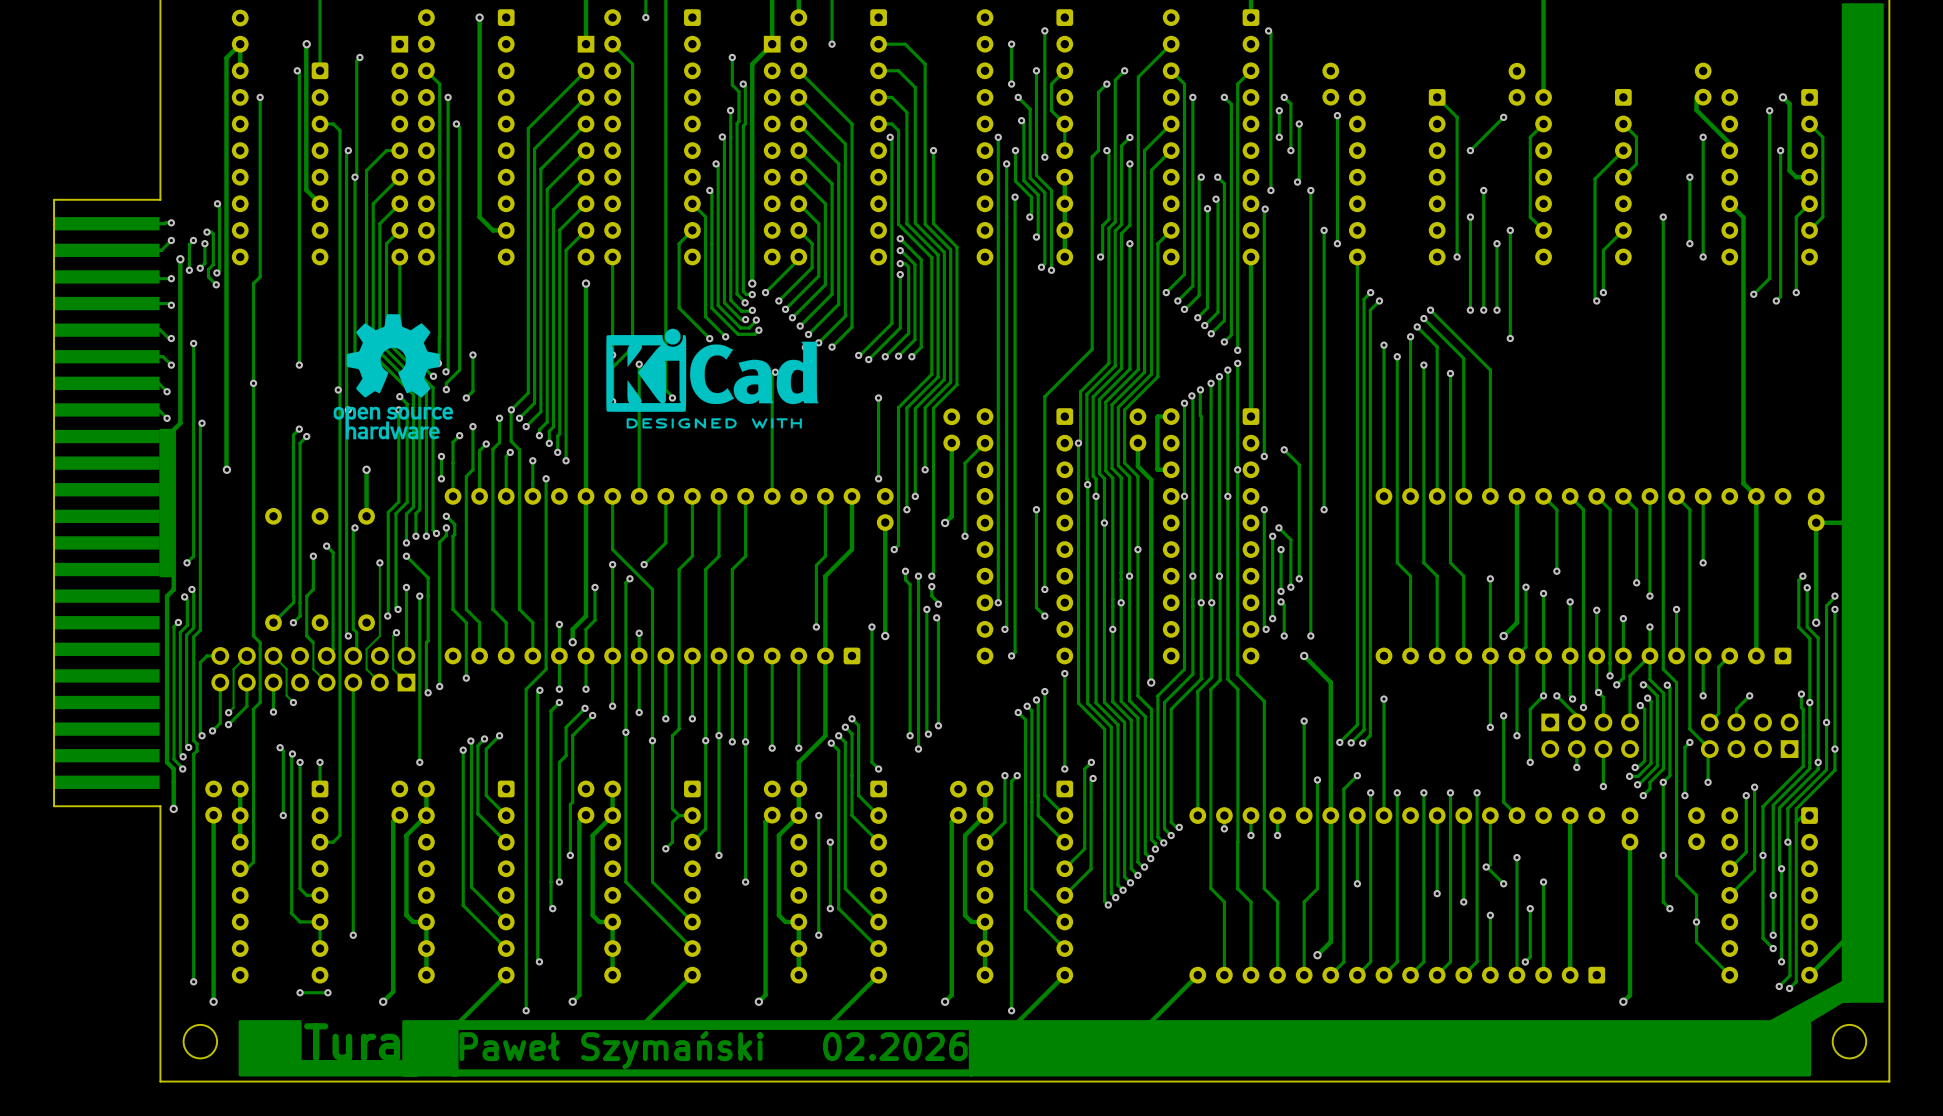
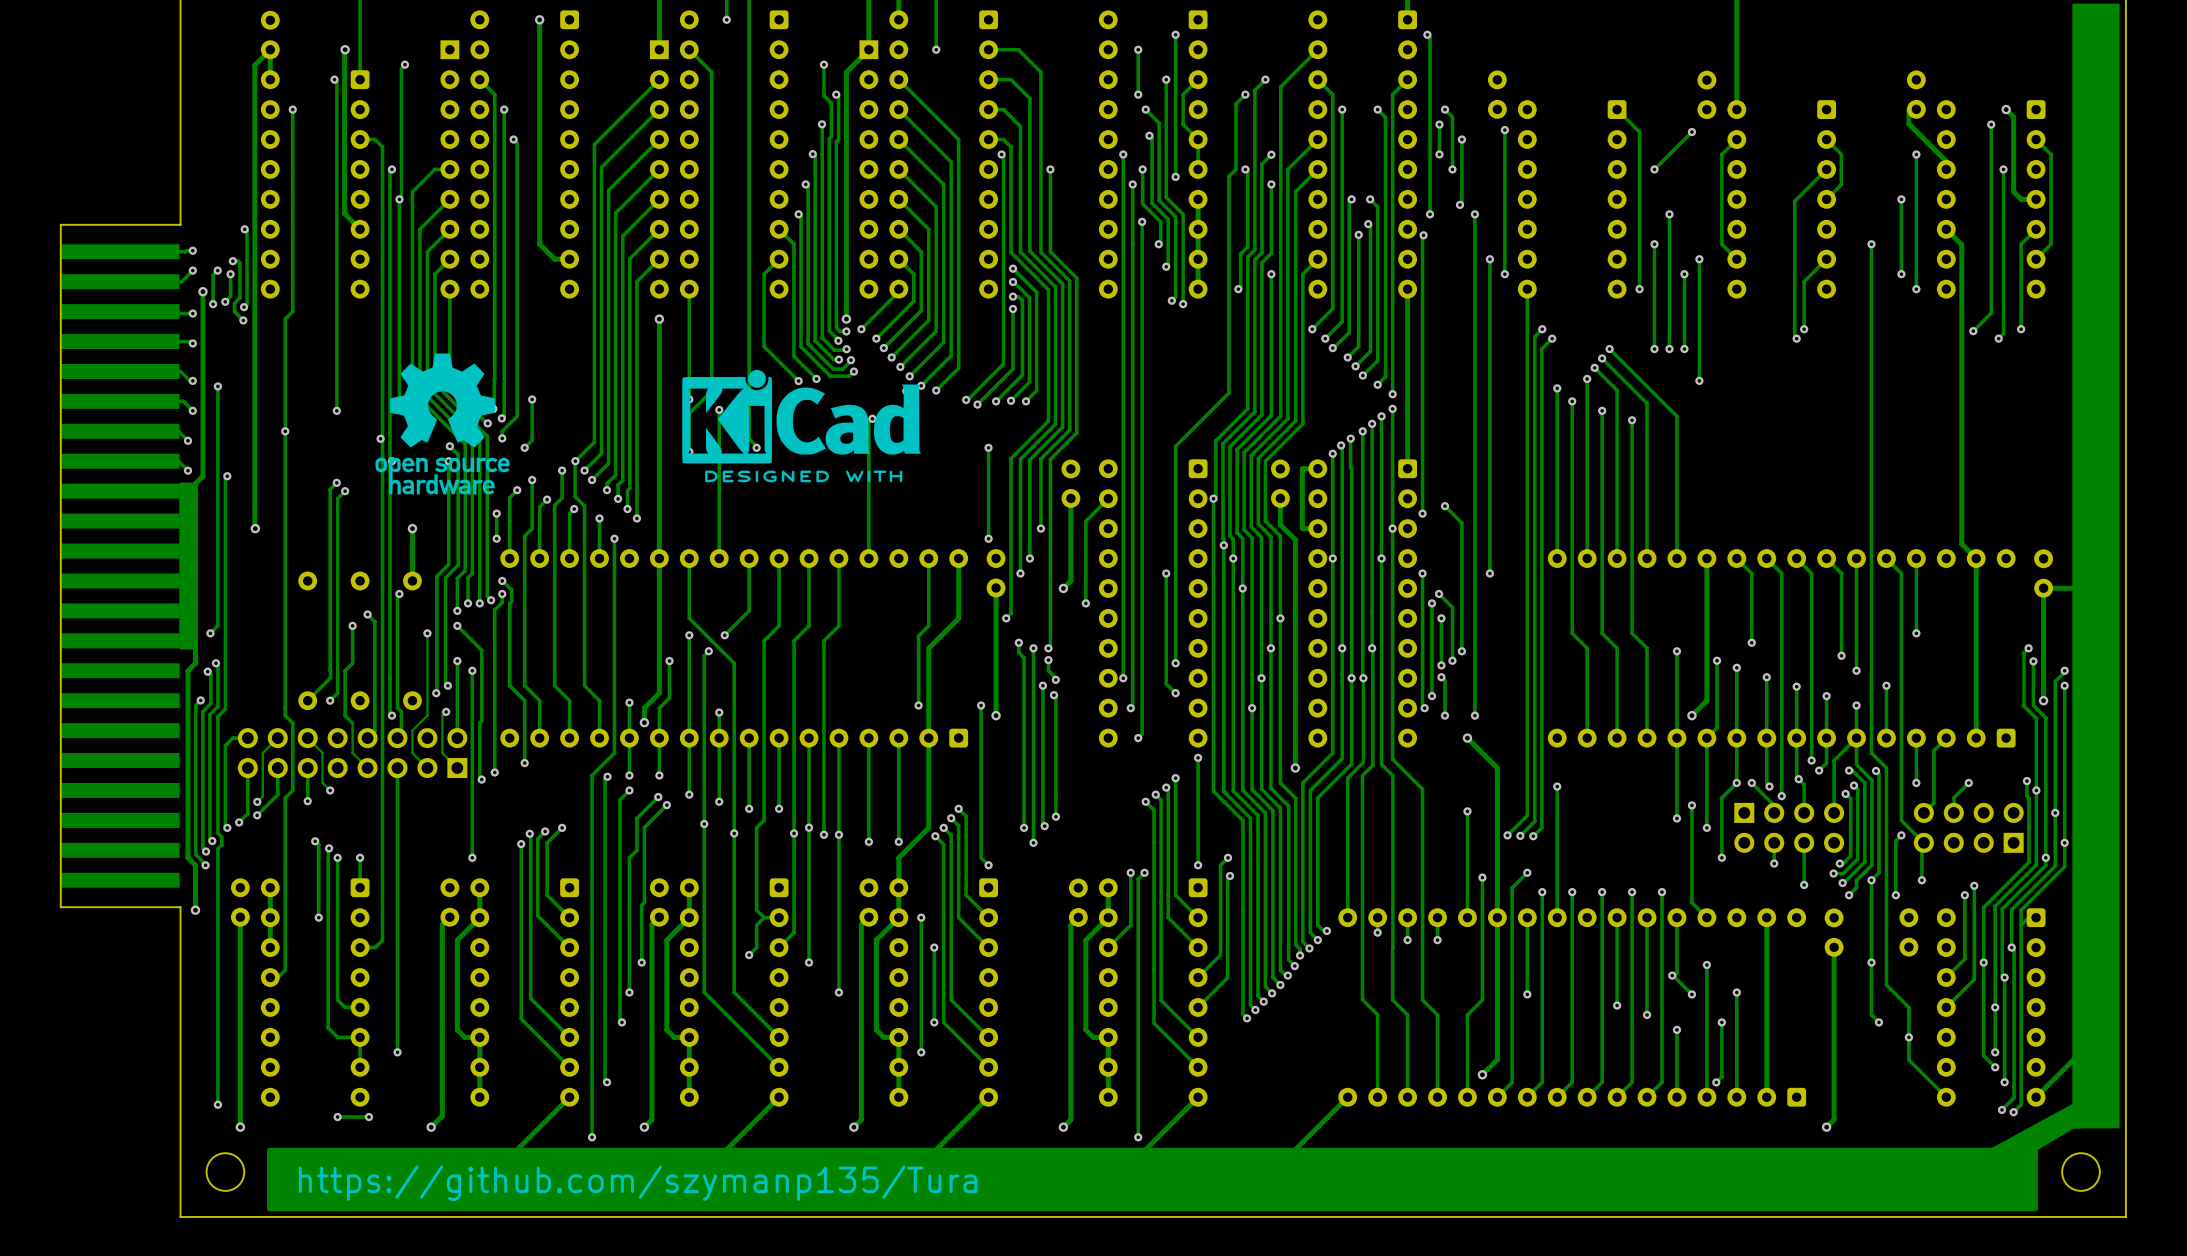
drawing: none -> [267, 1147, 2038, 1212]
drawing: [238, 1020, 1812, 1077] -> none
text: Tura (352, 1042) -> none
text: Paweł Szymański 02.2026 (713, 1050) -> none
text: none -> https://github.com/szymanp135/Tura (638, 1183)

